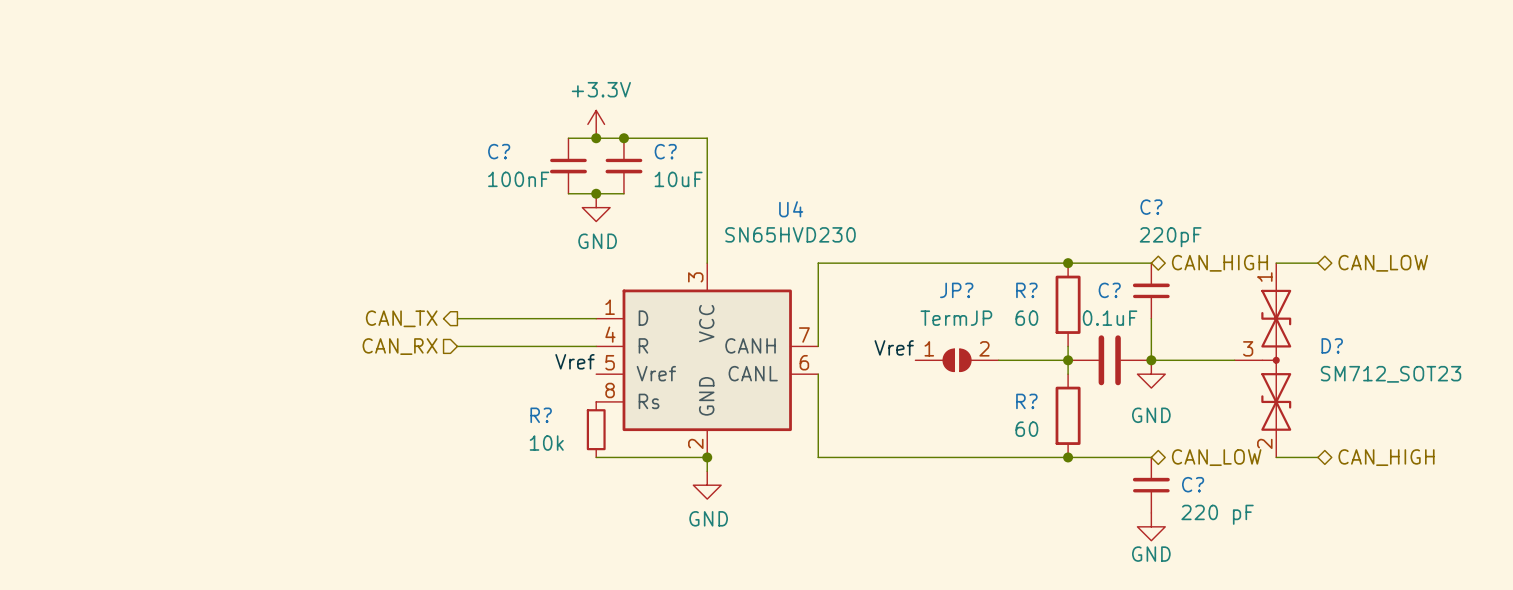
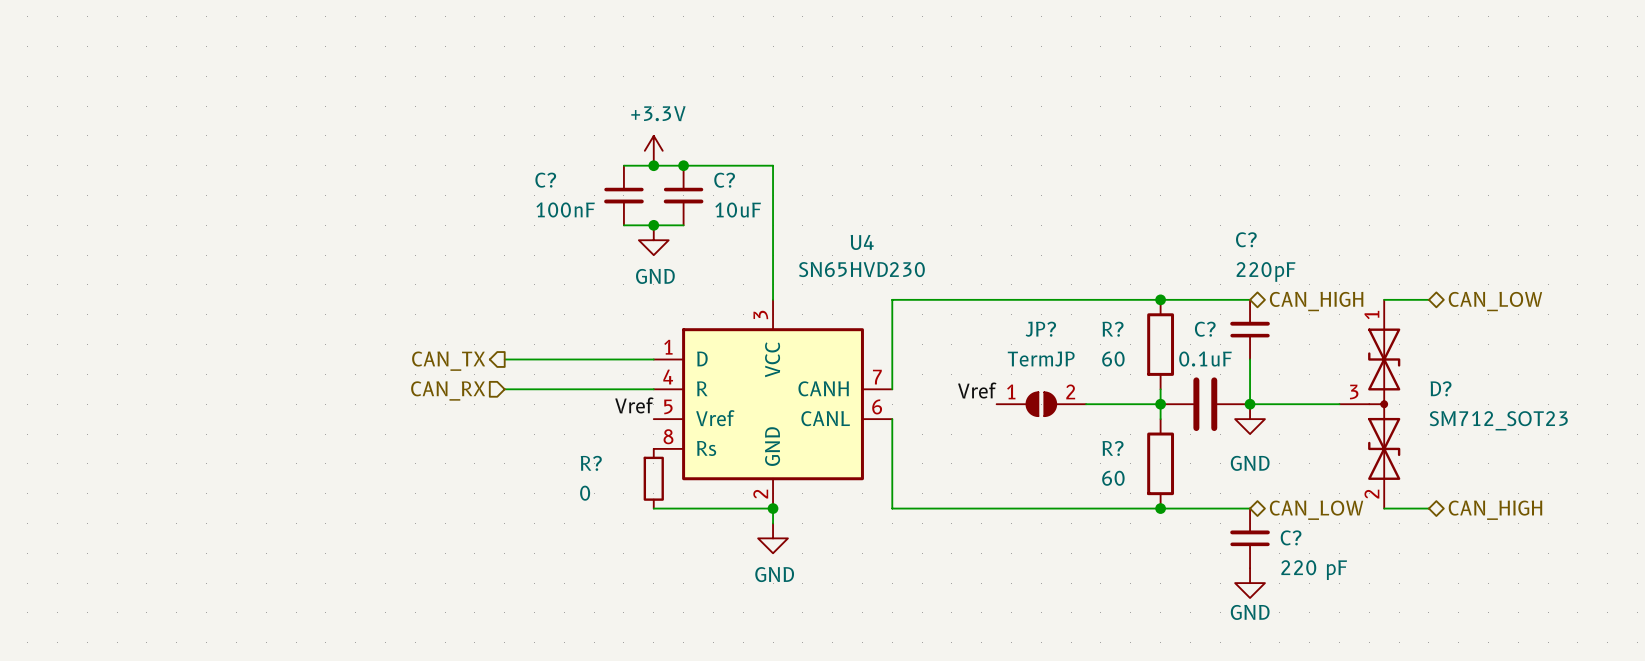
R? value: 10k (546, 443) -> 0 (585, 493)

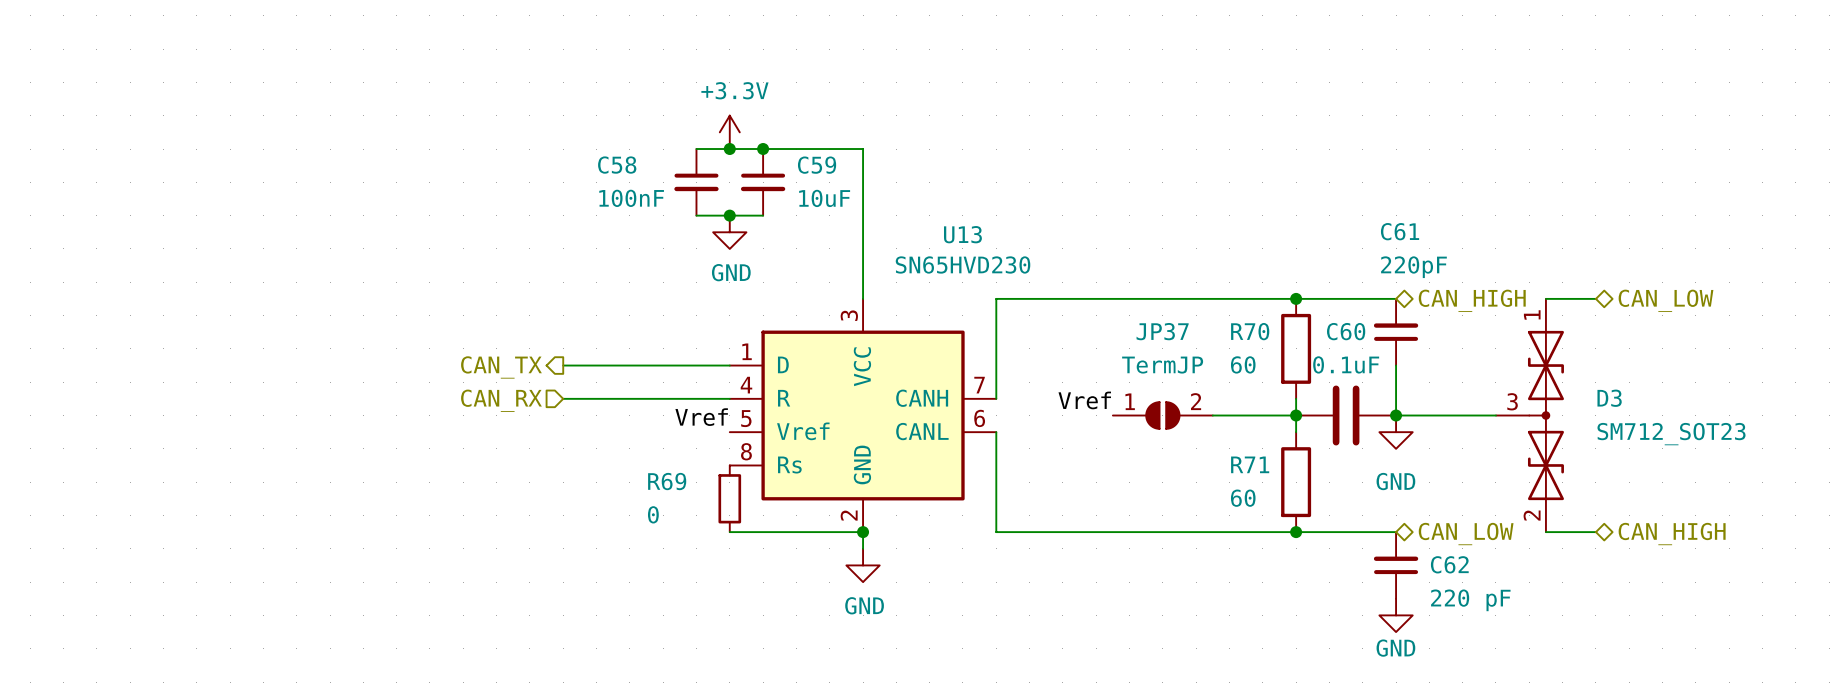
C? name: C? (545, 180) -> C58 (617, 165)
C? name: C? (724, 180) -> C59 (817, 165)
C? name: C? (1246, 239) -> C61 (1400, 231)
U4 name: U4 (862, 242) -> U13 (962, 234)
JP? name: JP? (1040, 329) -> JP37 (1162, 331)
R? name: R? (1113, 329) -> R70 (1250, 331)
C? name: C? (1205, 329) -> C60 (1346, 331)
D? name: D? (1441, 388) -> D3 (1609, 398)
R? name: R? (1113, 448) -> R71 (1250, 464)
R? name: R? (591, 463) -> R69 (667, 481)
C? name: C? (1291, 537) -> C62 (1449, 564)

